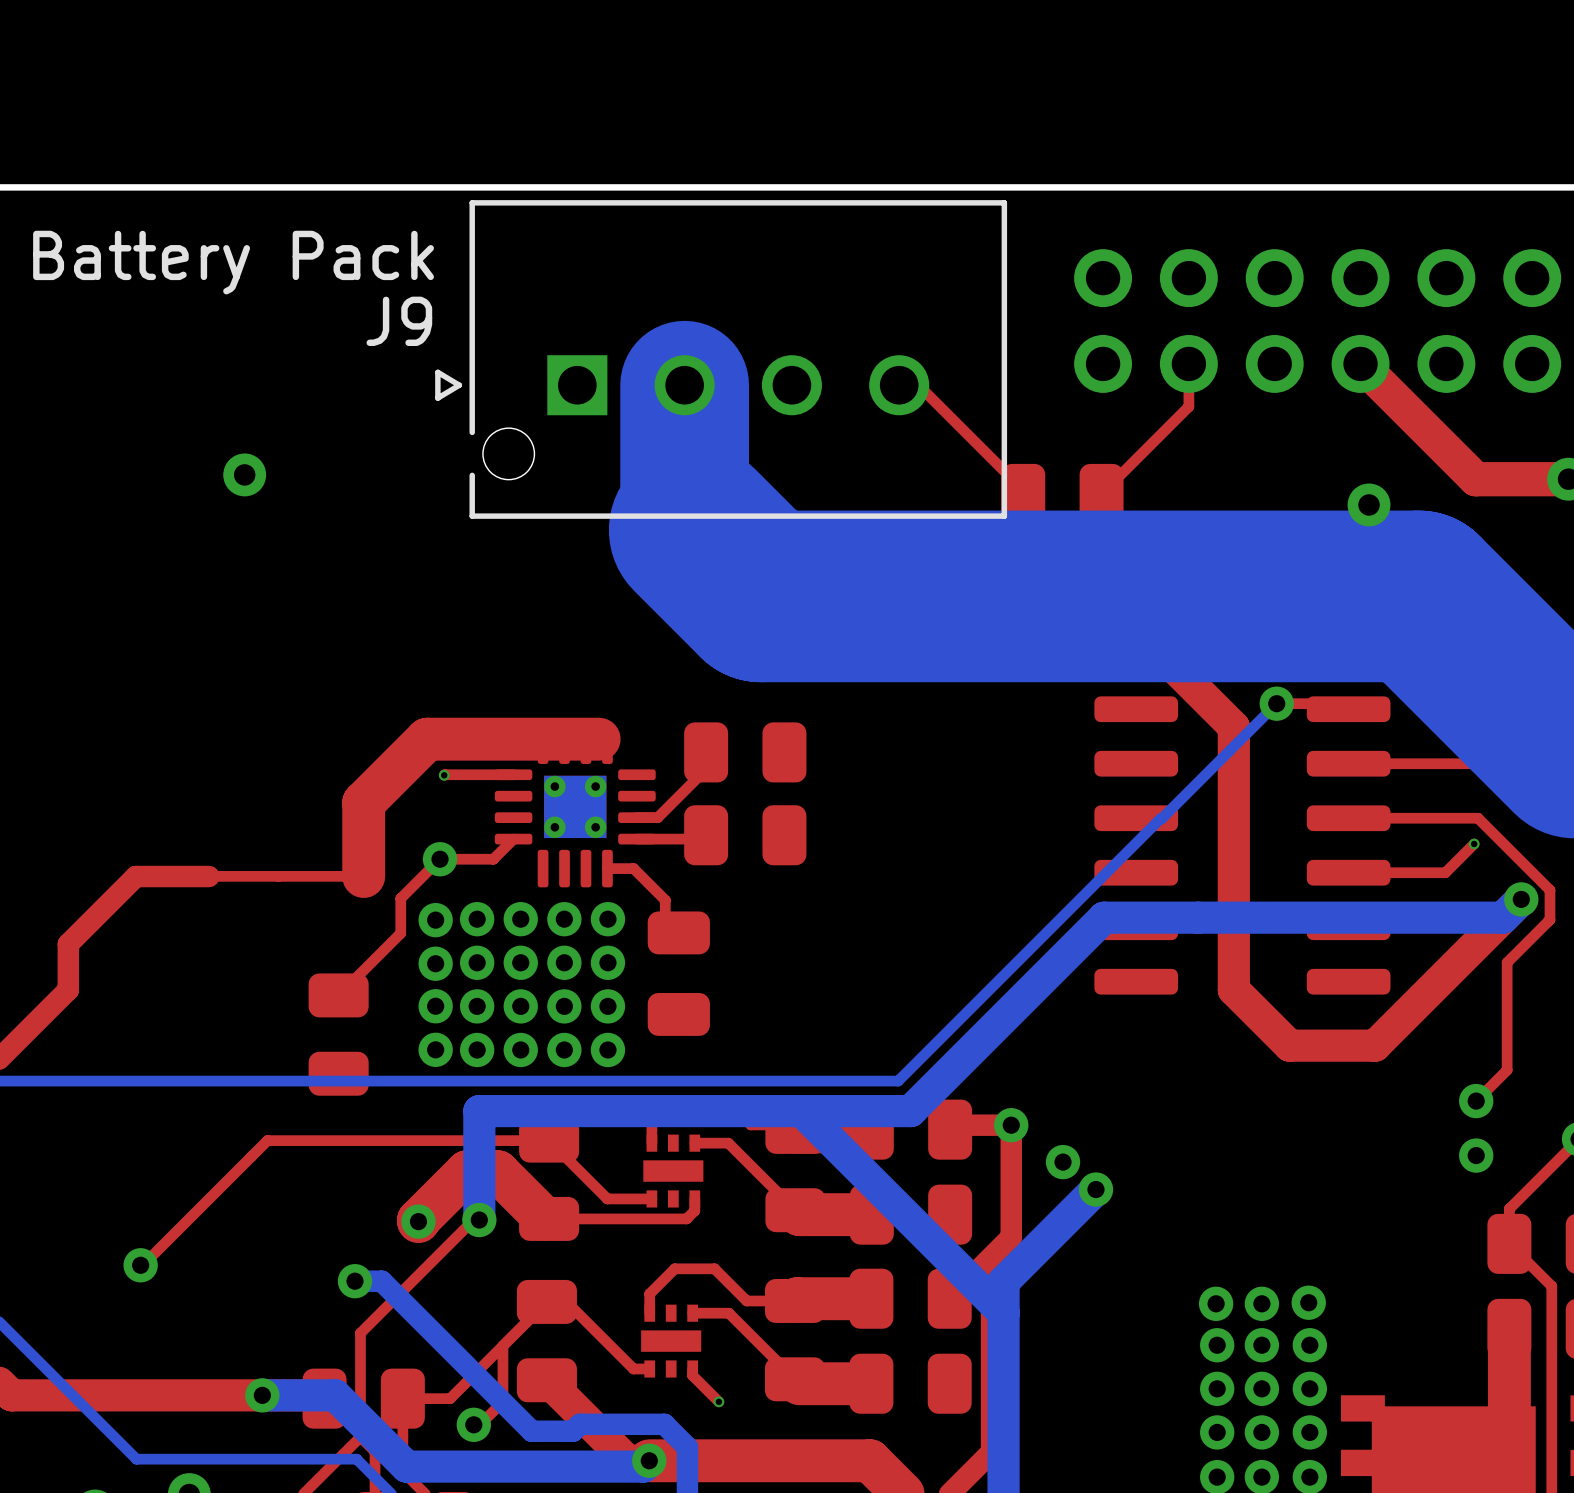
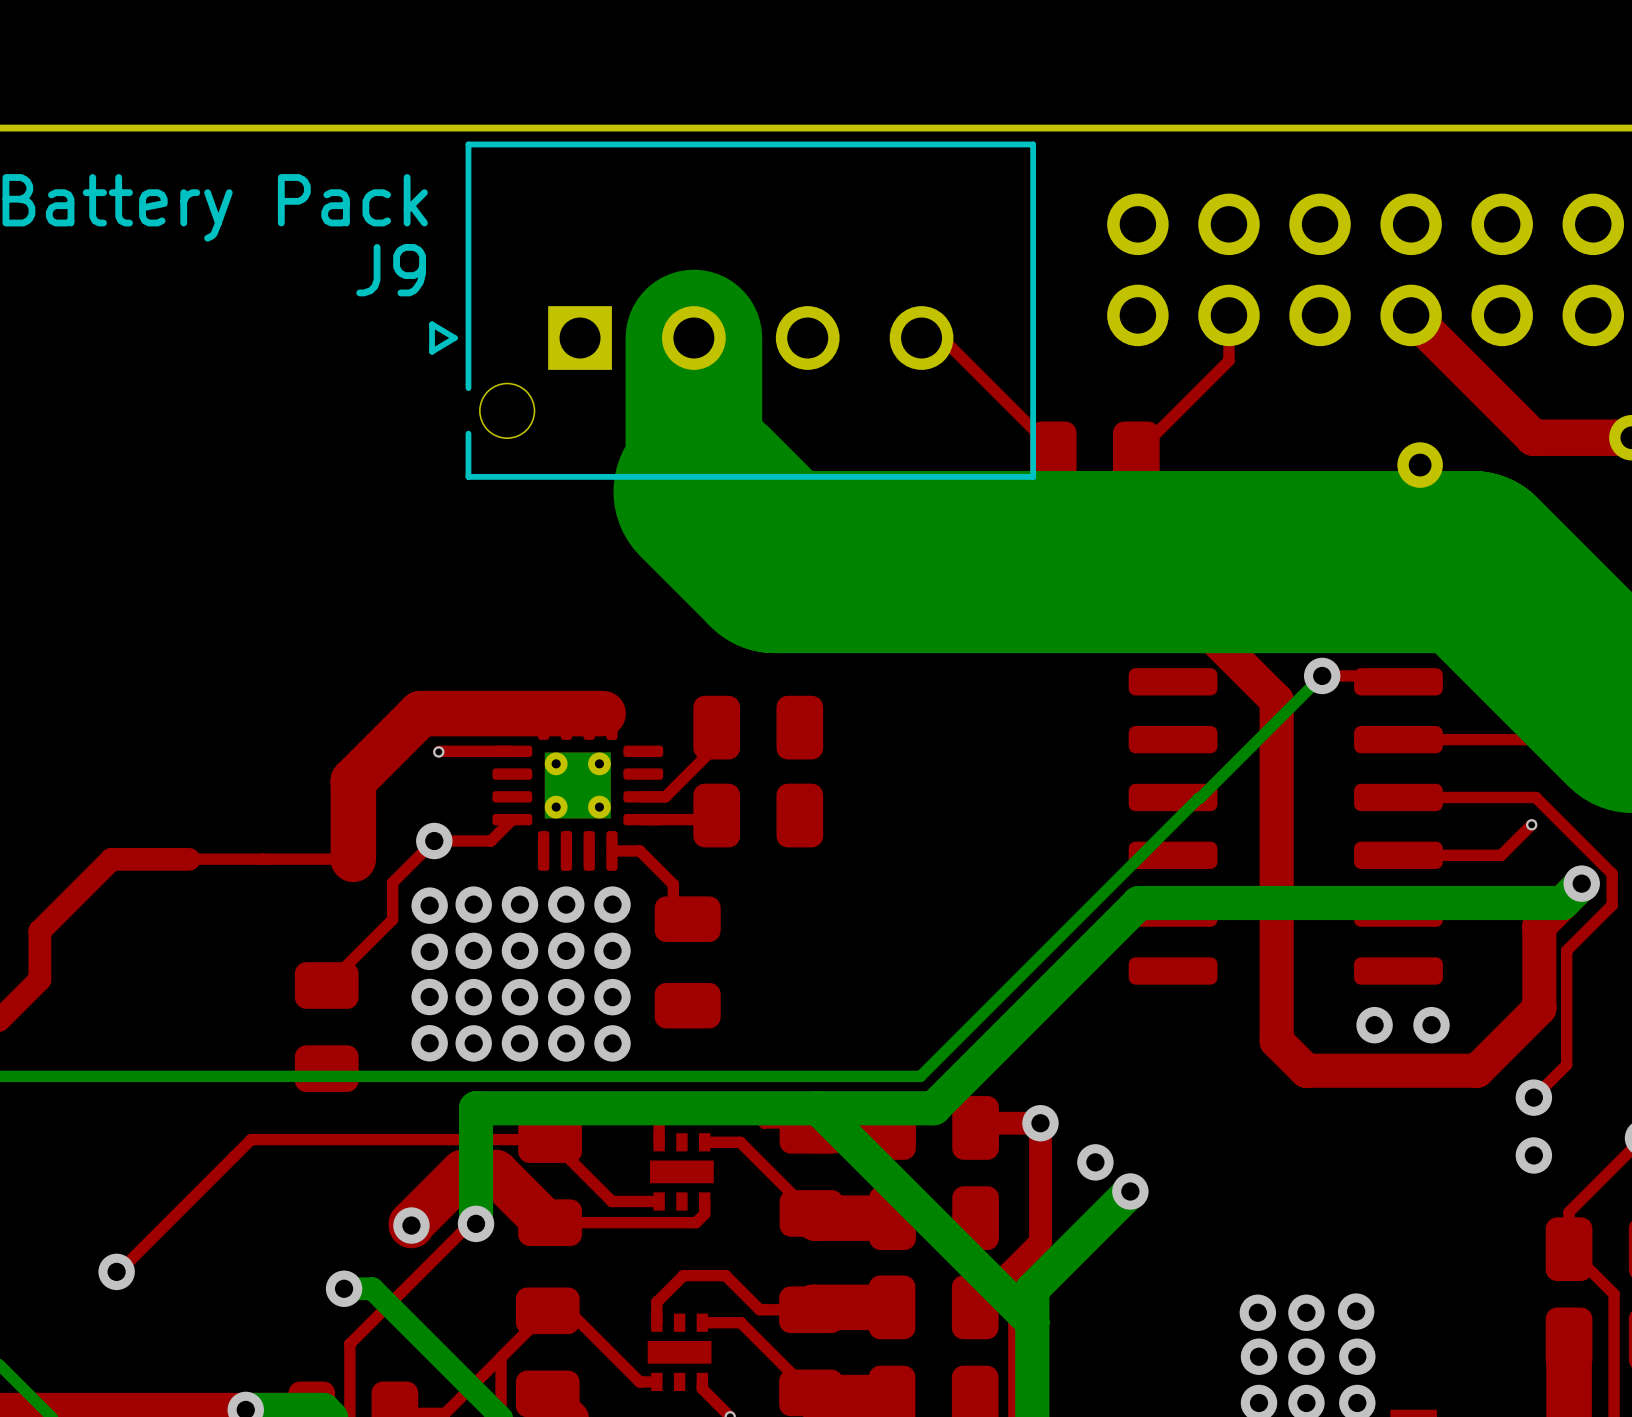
part: (244, 474) -> none
top track: (1481, 939) (1375, 1045) (1289, 1045) (1233, 989) -> (1539, 926) (1539, 1008) (1477, 1070) (1306, 1070) (1276, 1041) (1276, 979)
via: none -> (1374, 1025)
via: none -> (1431, 1025)

